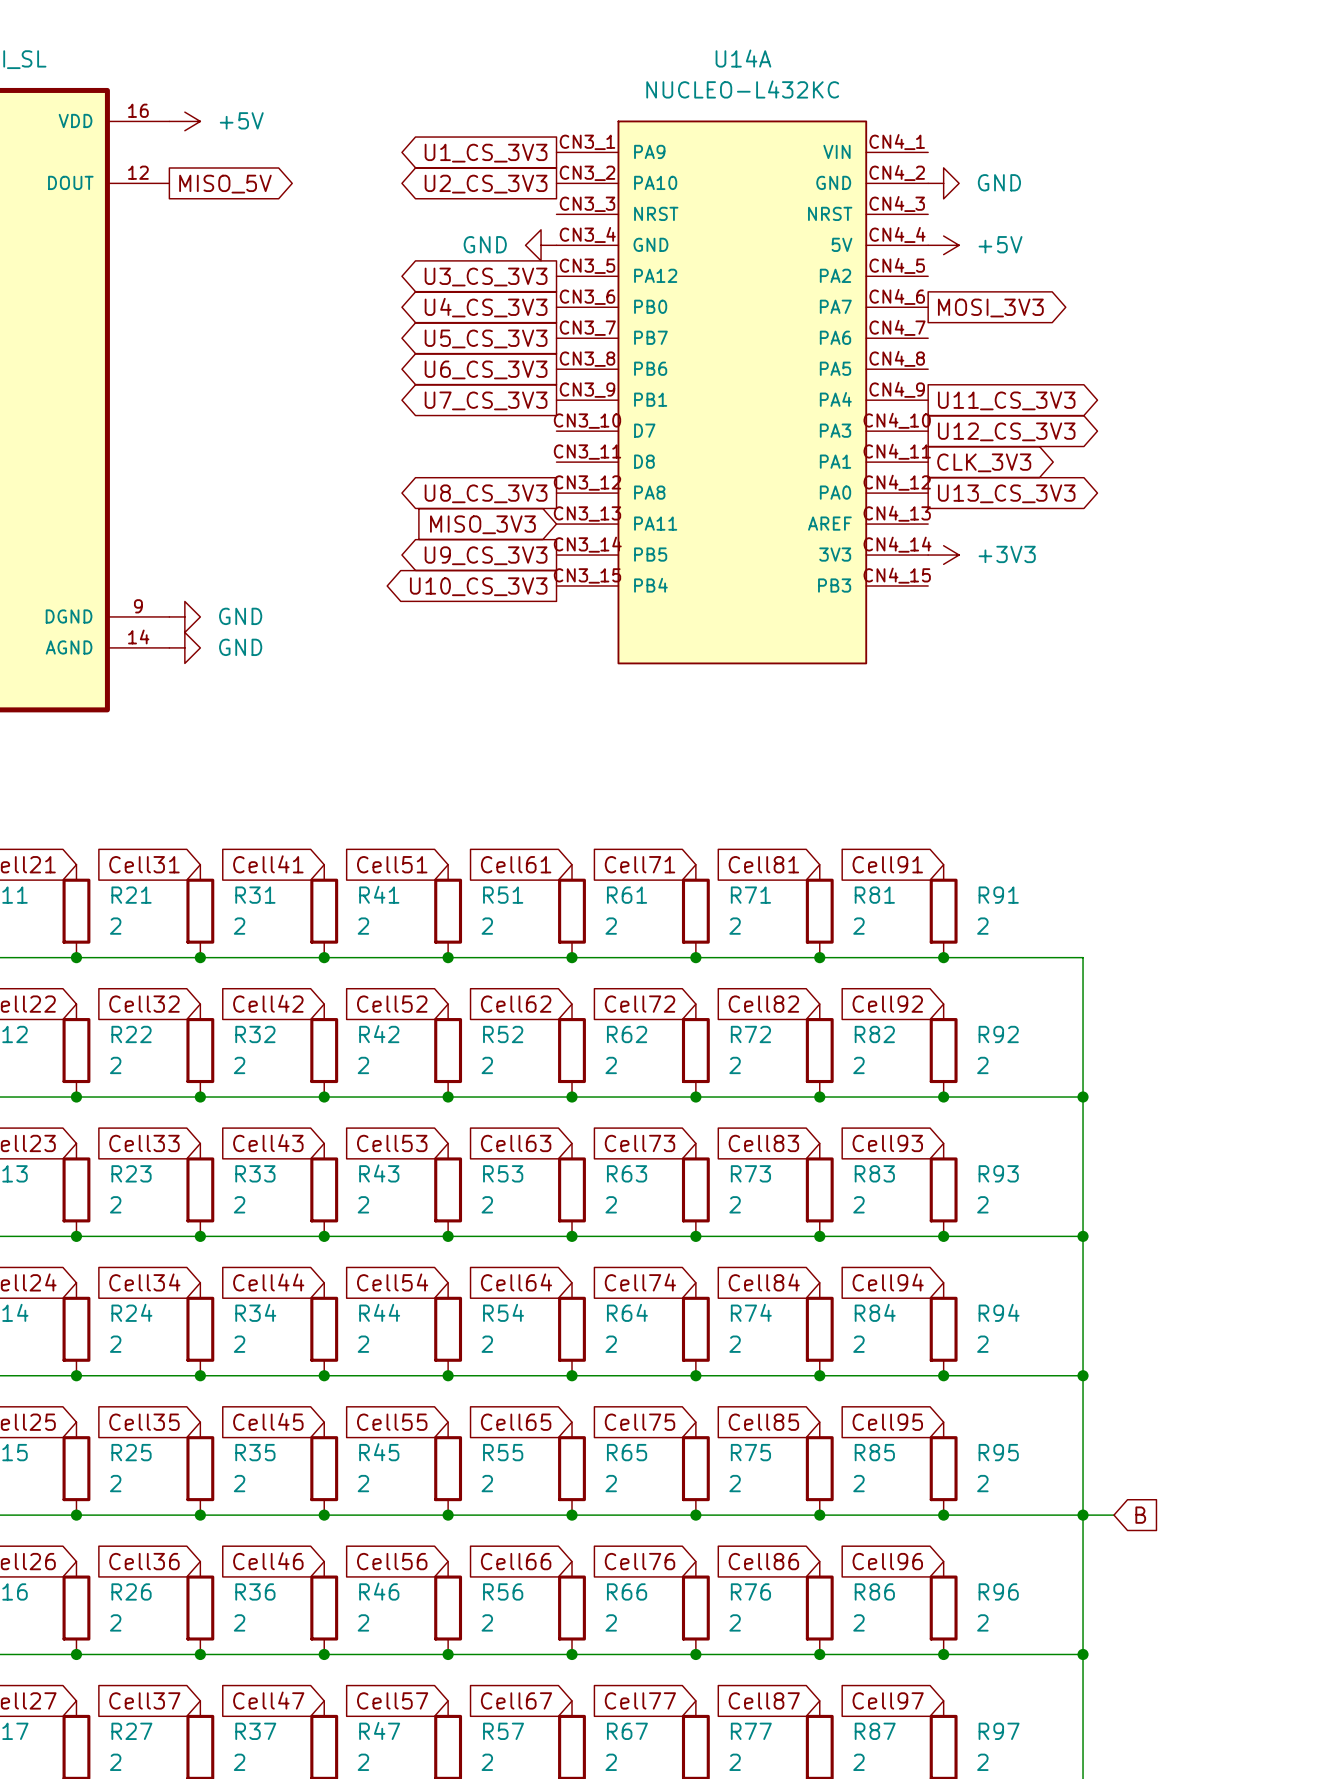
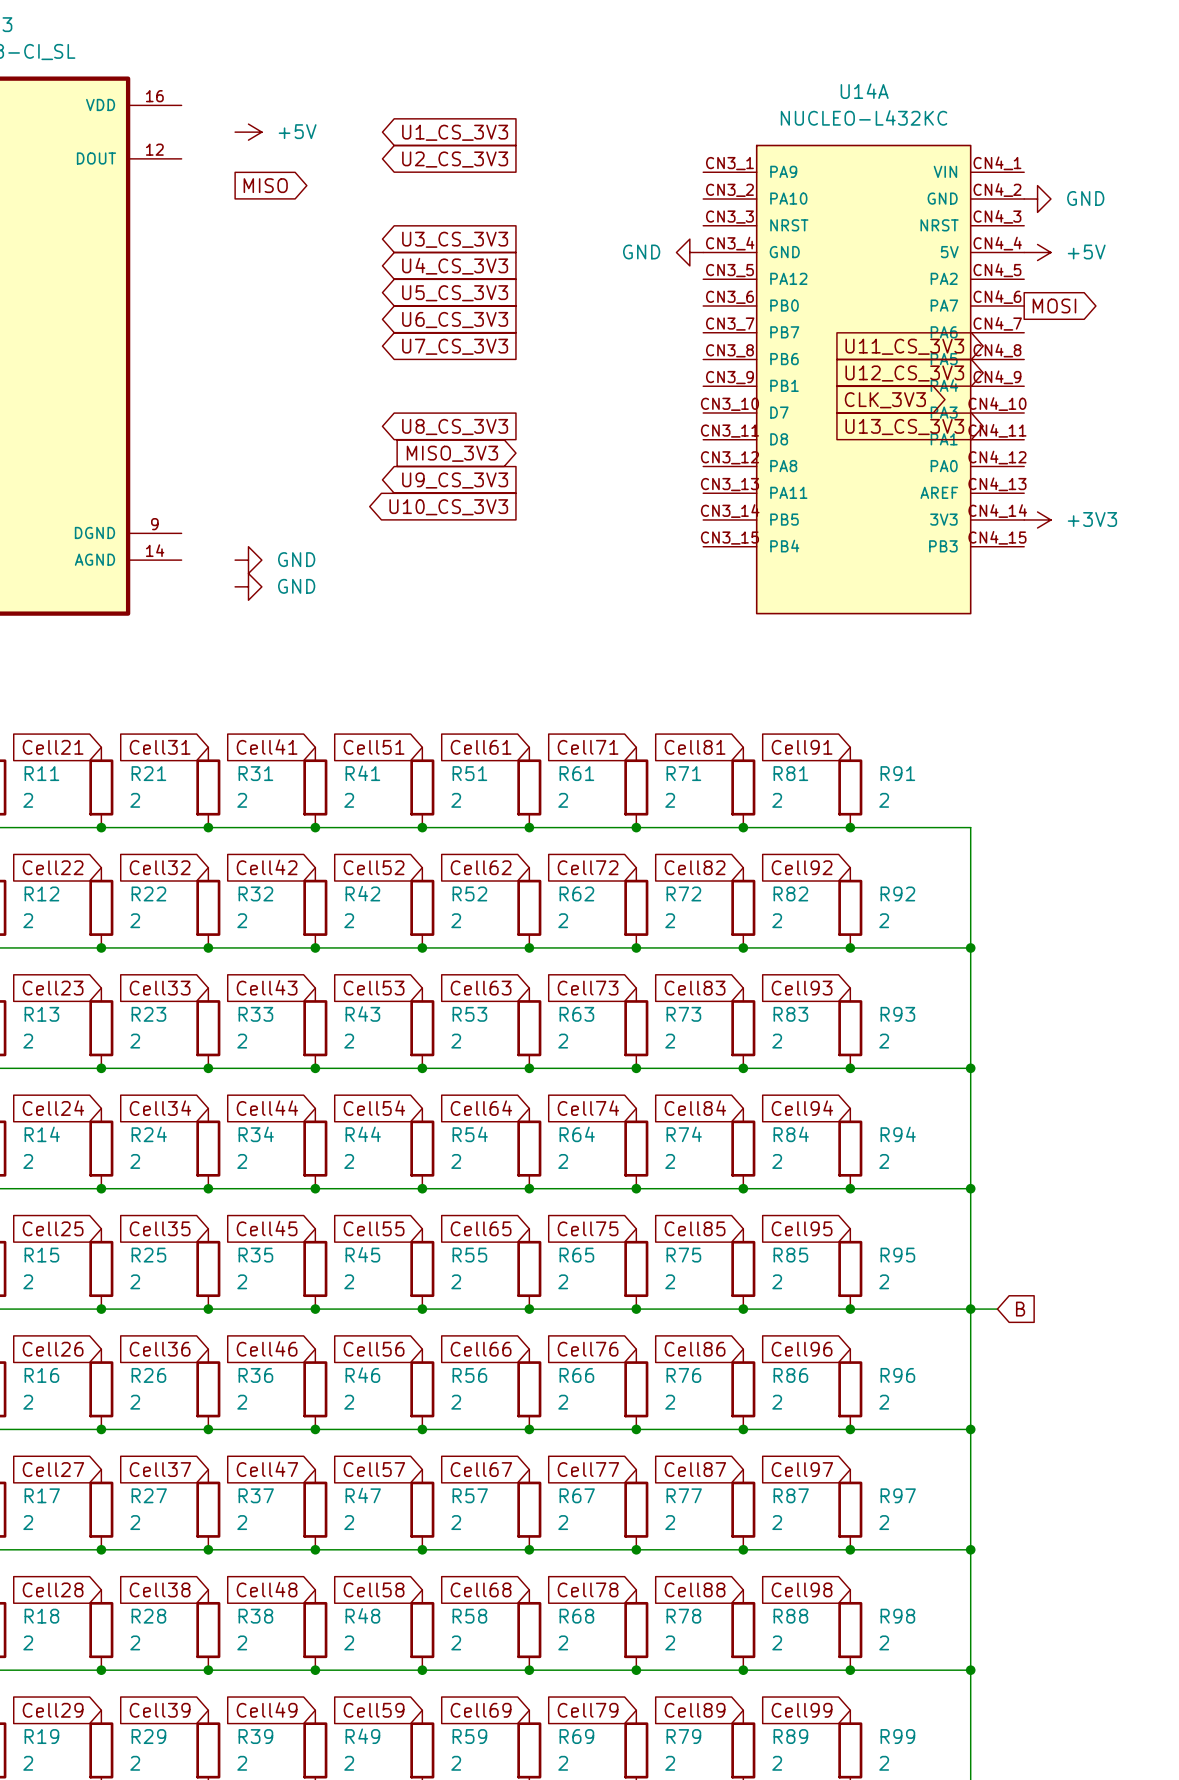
power symbol position: +5V (184, 121) -> +5V (248, 132)
power symbol: GND (943, 183) -> none
global label: MISO_5V (225, 184) -> MISO (265, 185)
power symbol: none -> GND (1037, 199)
power symbol: GND (541, 245) -> none
power symbol position: +5V (943, 245) -> +5V (1037, 252)
power symbol: none -> GND (689, 252)
global label: MOSI_3V3 (990, 307) -> none
global label: none -> MOSI (1054, 306)
U14A position: (742, 392) -> (863, 379)
power symbol position: +3V3 (943, 555) -> +3V3 (1037, 519)
power symbol: GND (184, 616) -> none
power symbol: GND (184, 647) -> none
power symbol: none -> GND (248, 560)
power symbol: none -> GND (248, 586)

